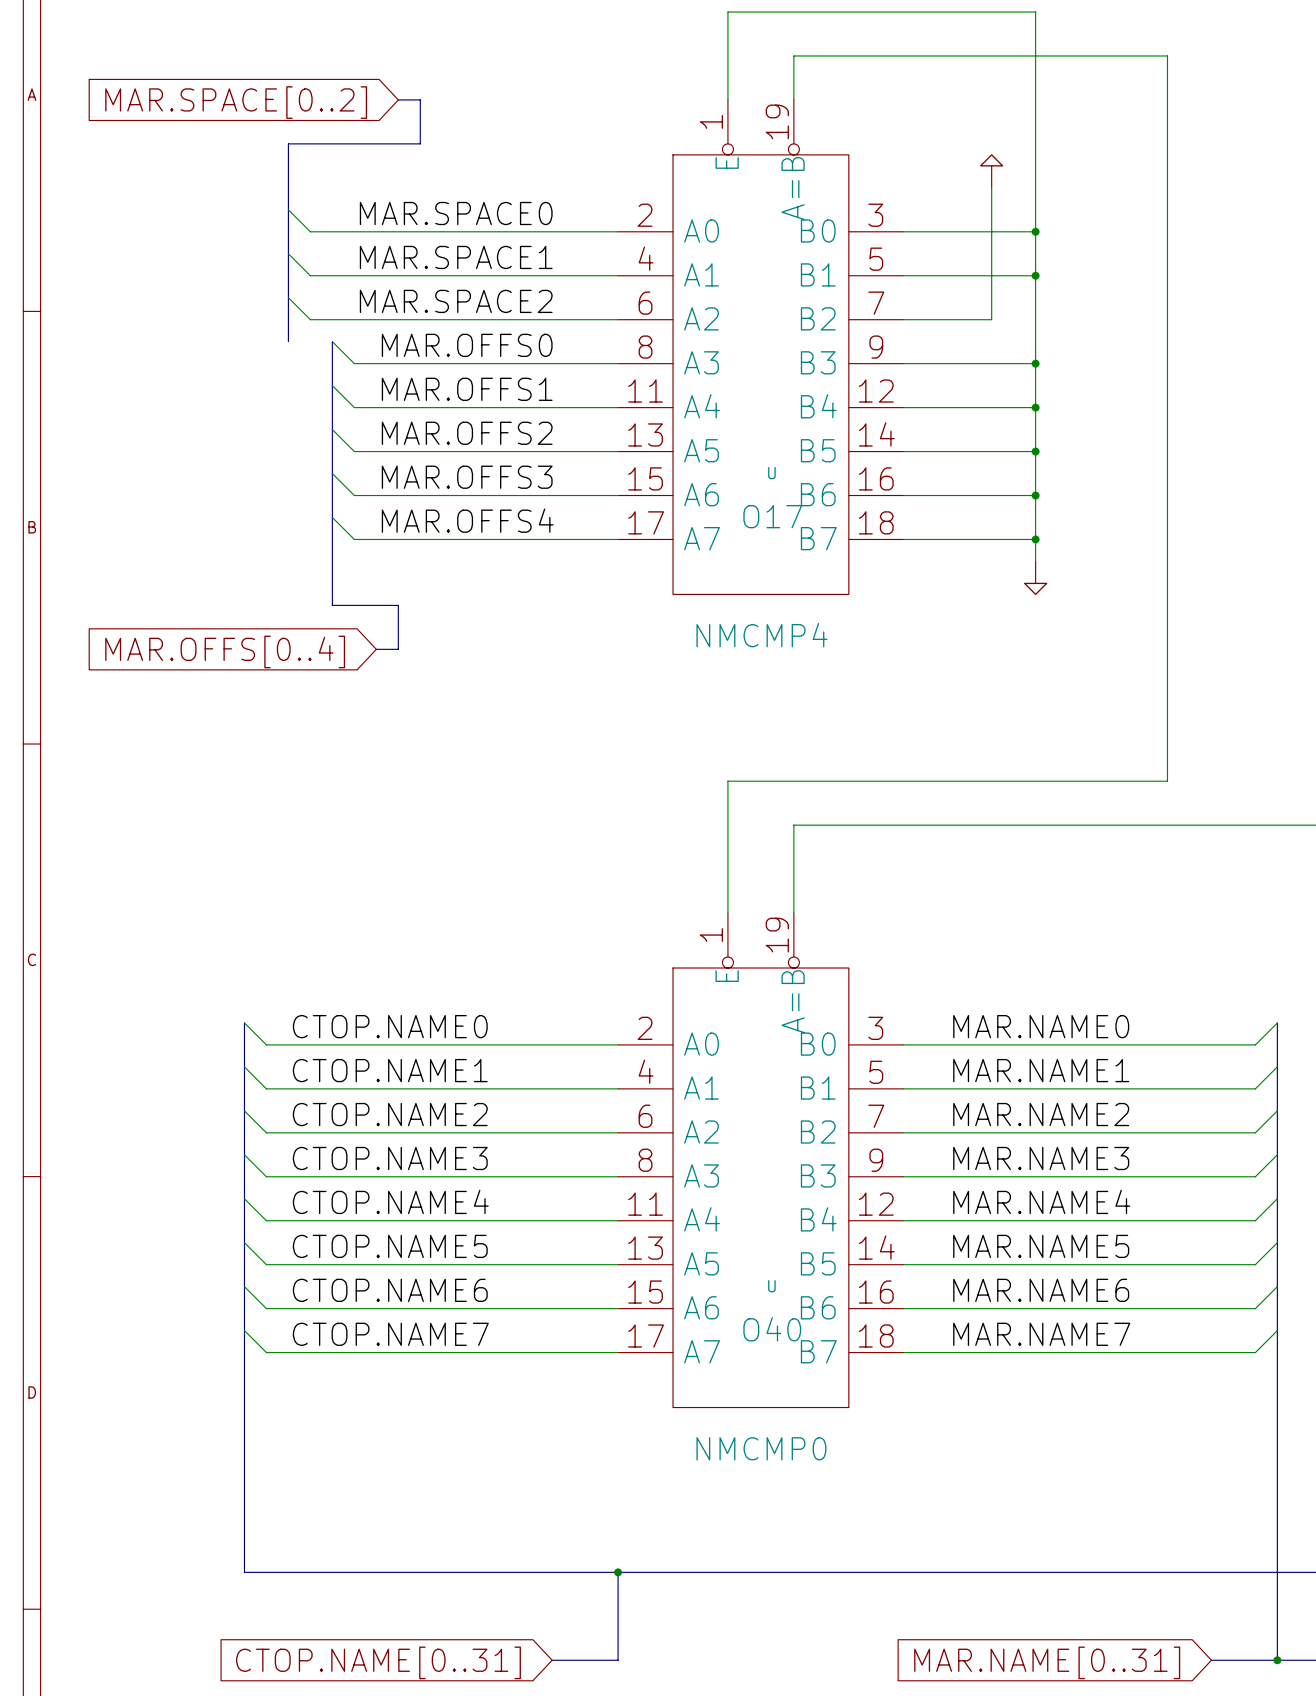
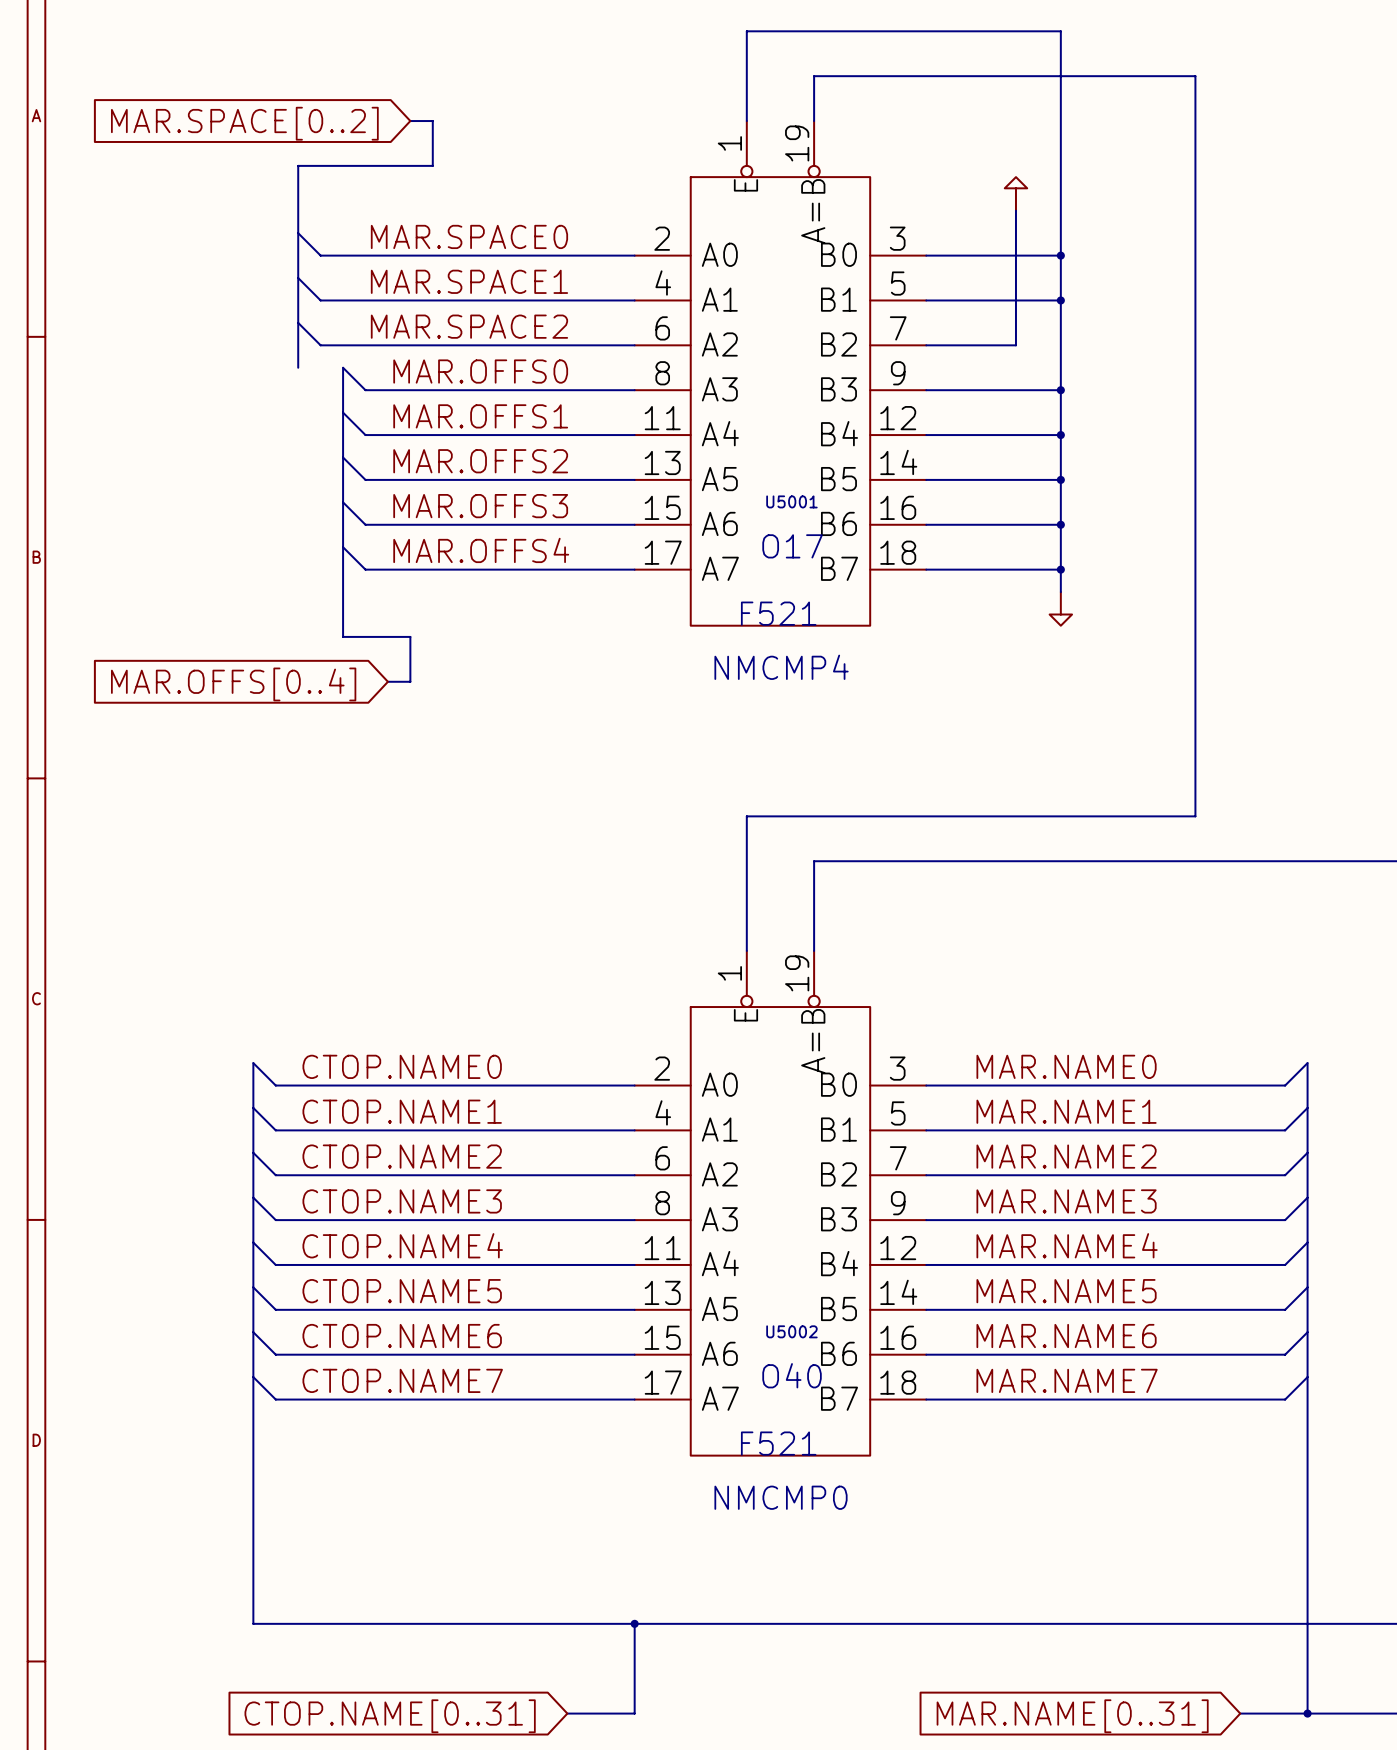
U name: U (771, 473) -> U5001 (791, 501)
U value: none -> F521 (778, 613)
U name: U (771, 1286) -> U5002 (791, 1331)
U value: none -> F521 (778, 1443)

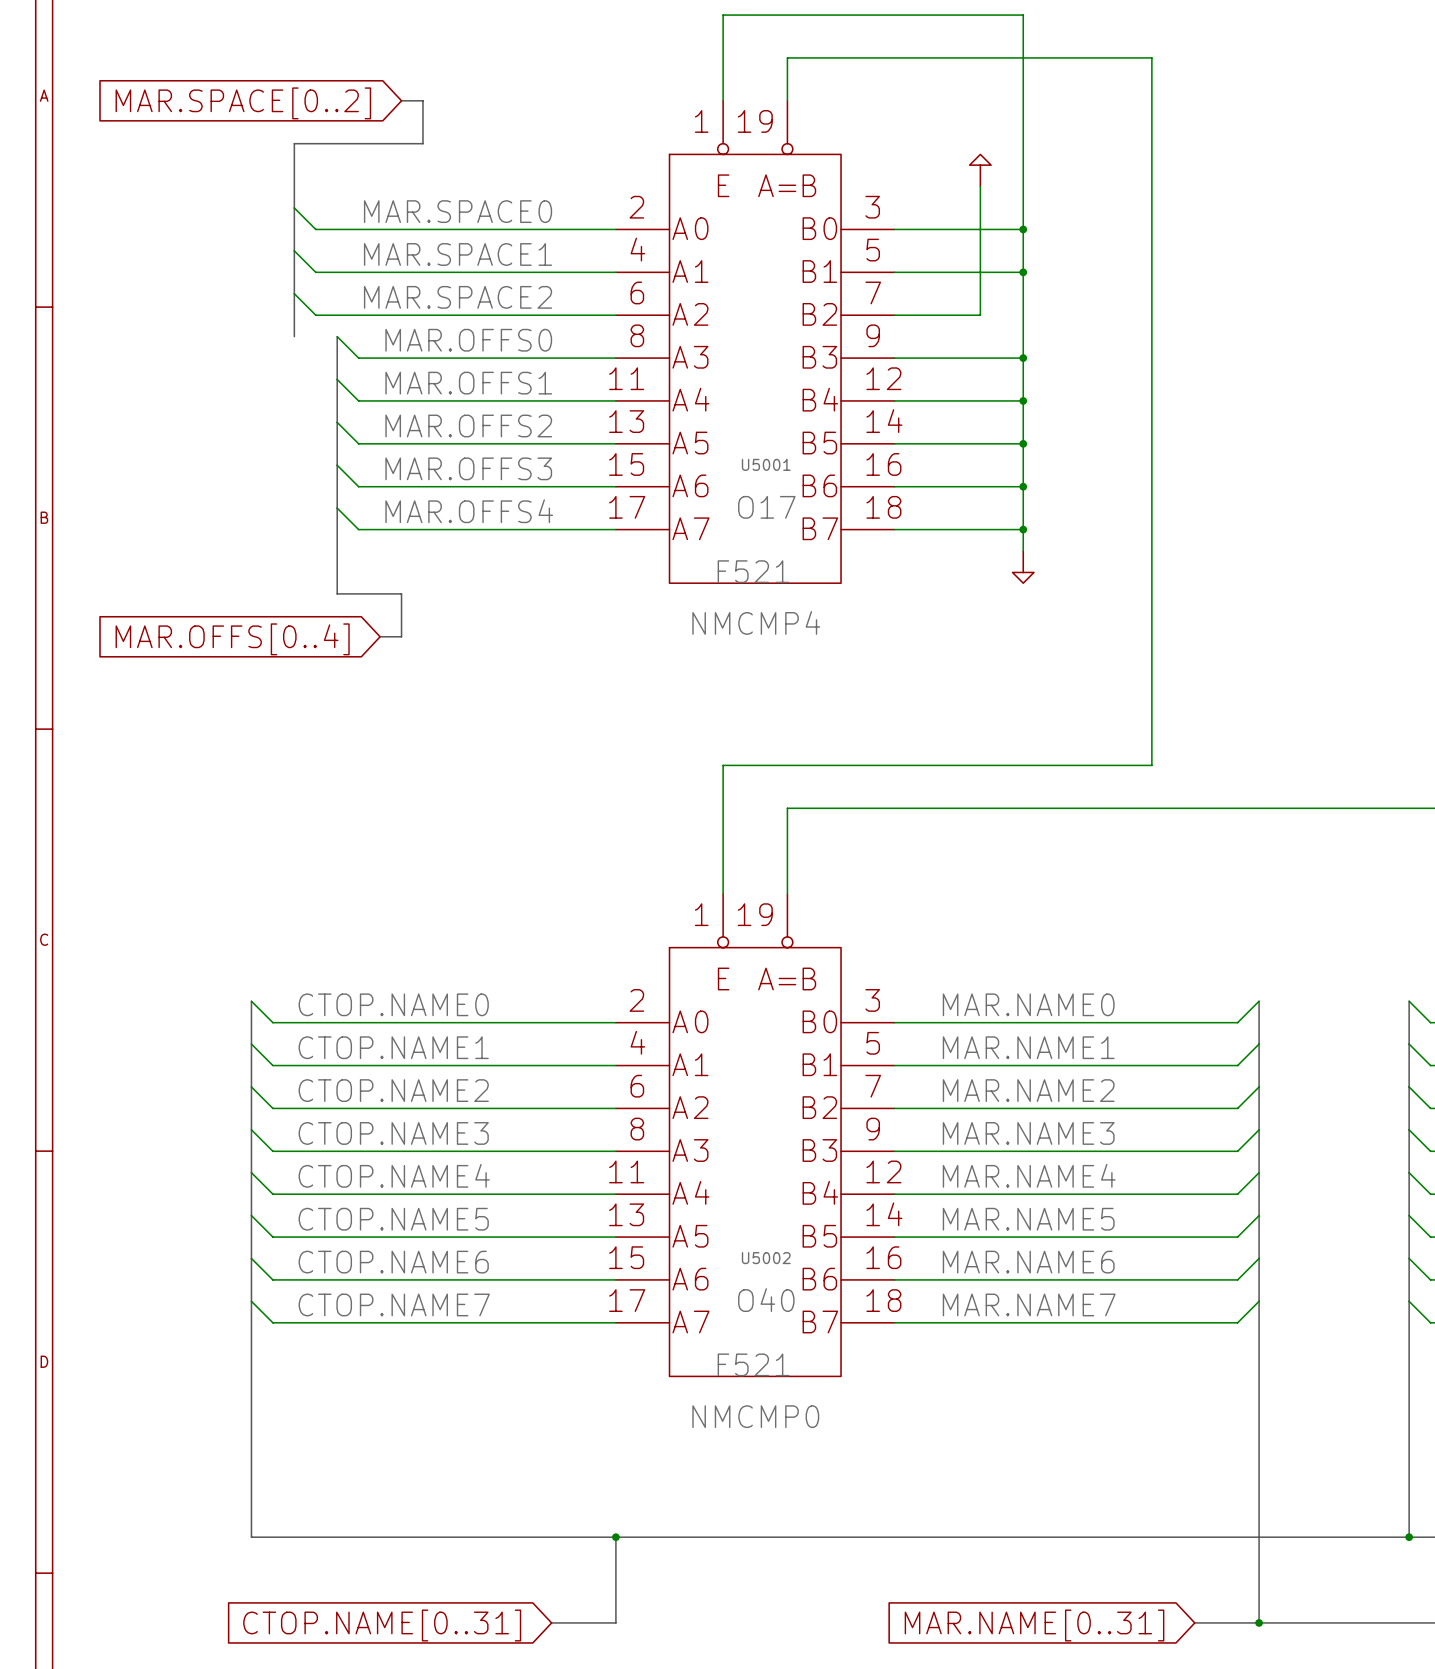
U5001 symbol: [634, 121, 927, 626] -> [615, 100, 895, 584]
U5002 symbol: [634, 950, 927, 1456] -> [615, 894, 895, 1377]

